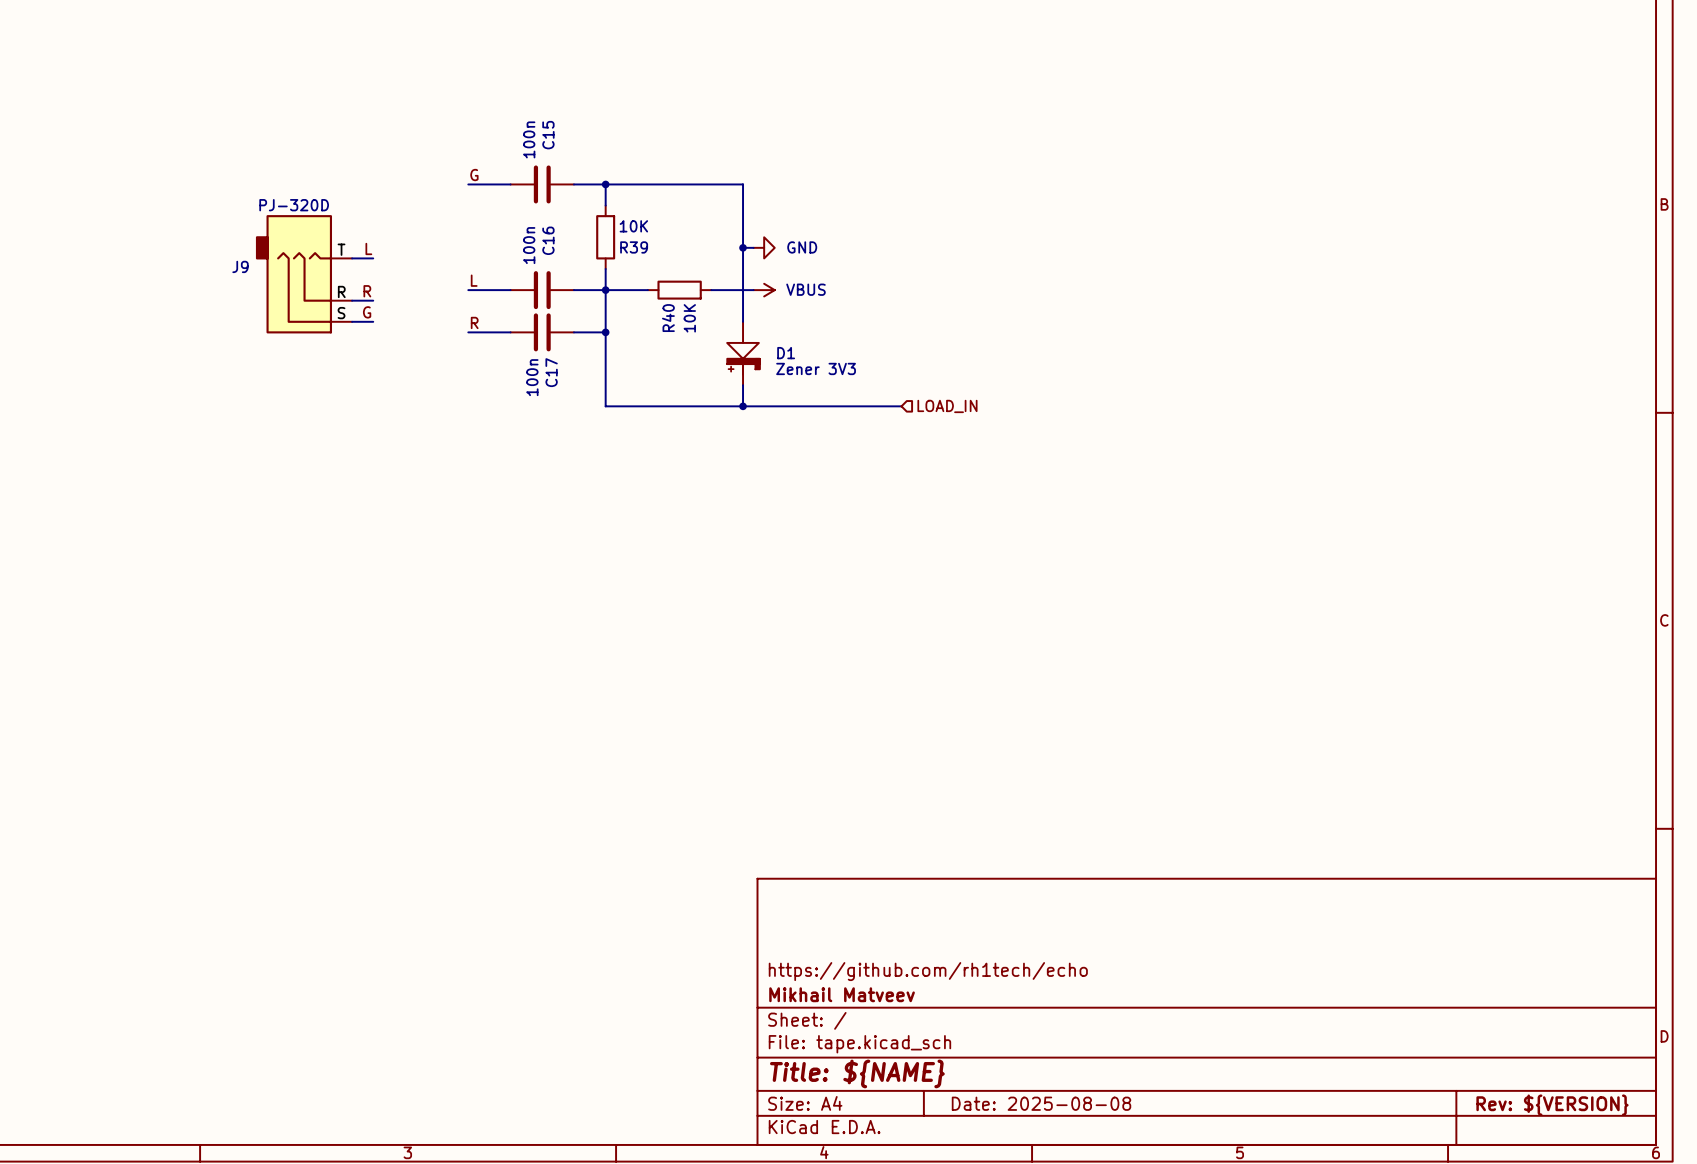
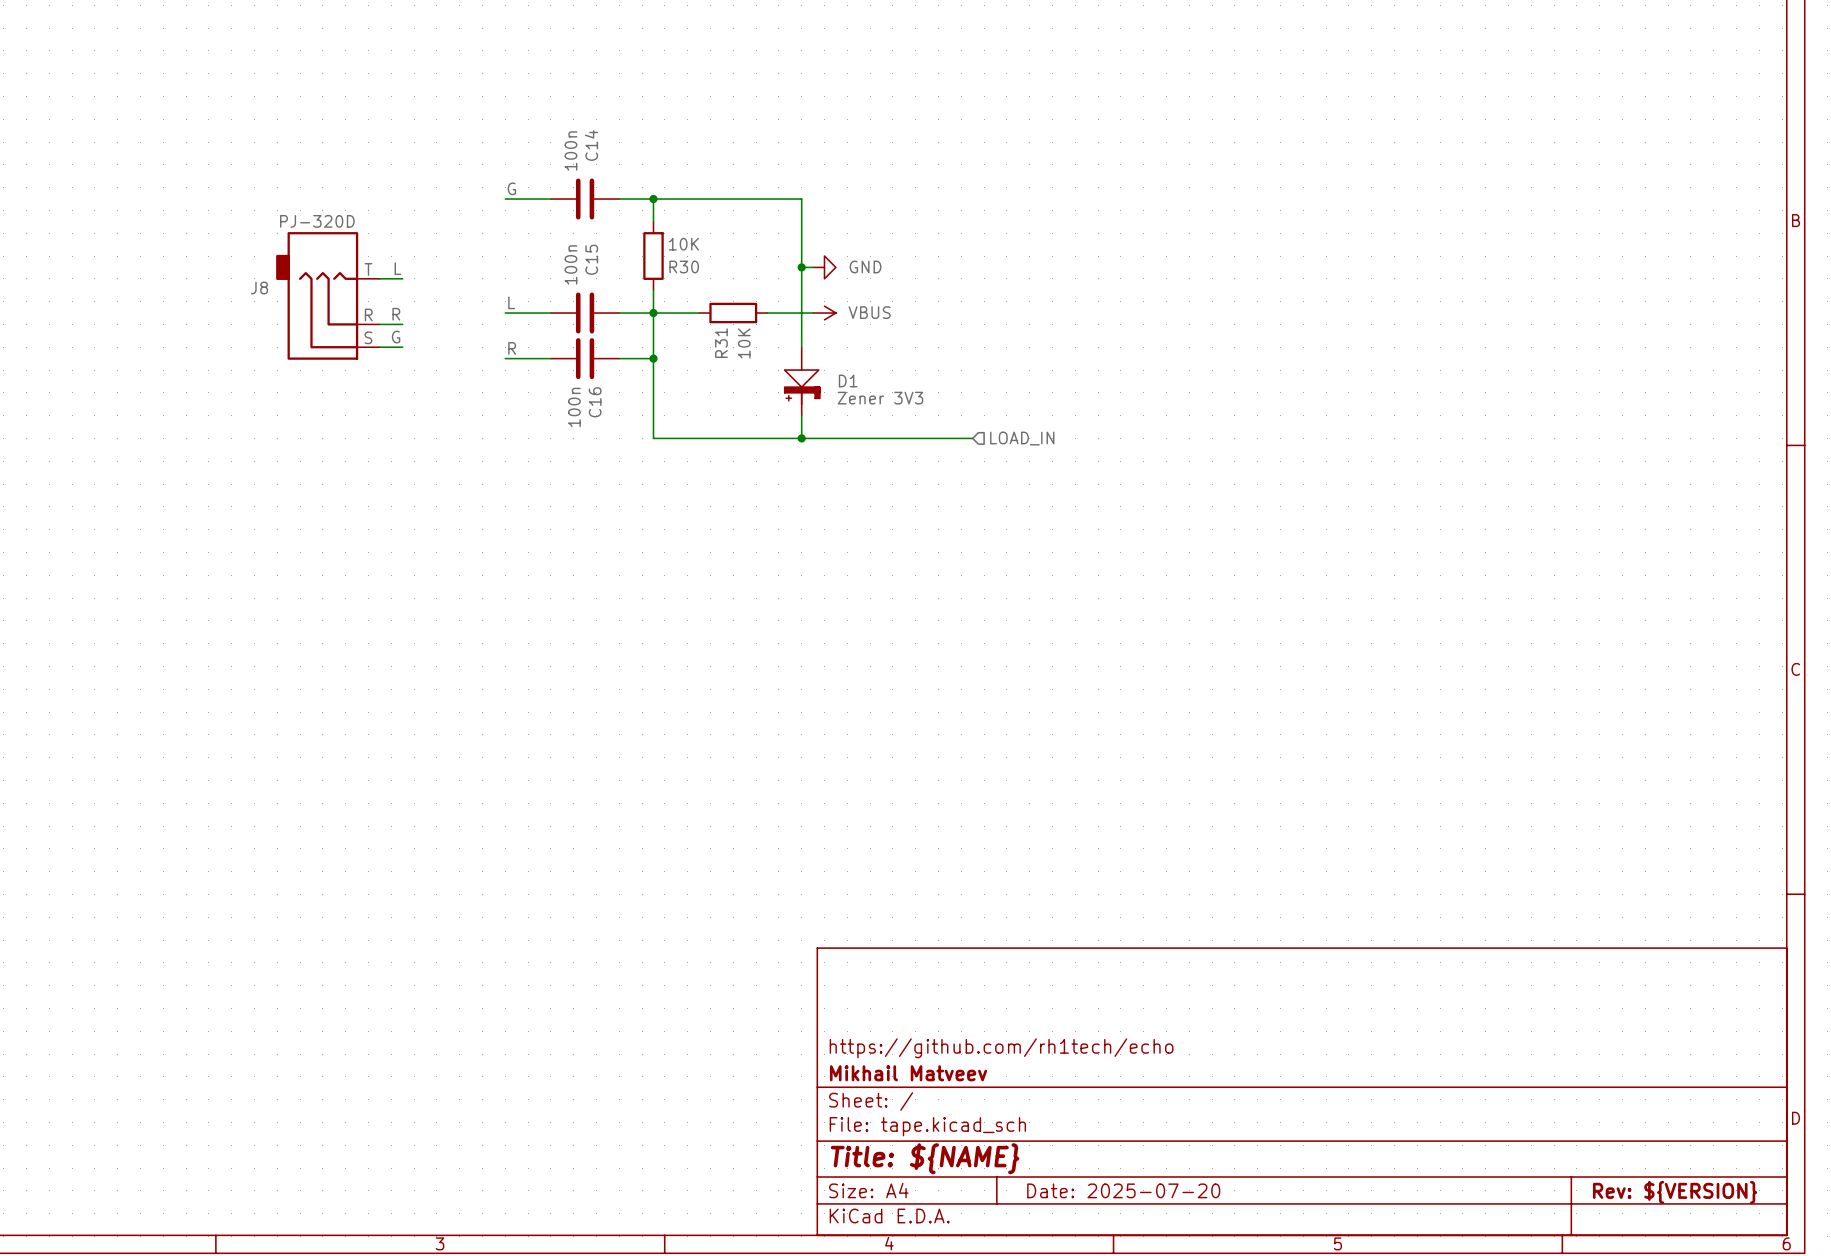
C15 name: C15 (548, 135) -> C14 (591, 145)
C16 name: C16 (548, 240) -> C15 (591, 259)
R39 name: R39 (634, 247) -> R30 (684, 266)
J9 name: J9 (240, 266) -> J8 (259, 288)
R40 name: R40 (668, 318) -> R31 (721, 343)
C17 name: C17 (551, 372) -> C16 (595, 402)
title block: Date: 2025-08-08 (1041, 1103) -> Date: 2025-07-20 (1123, 1190)

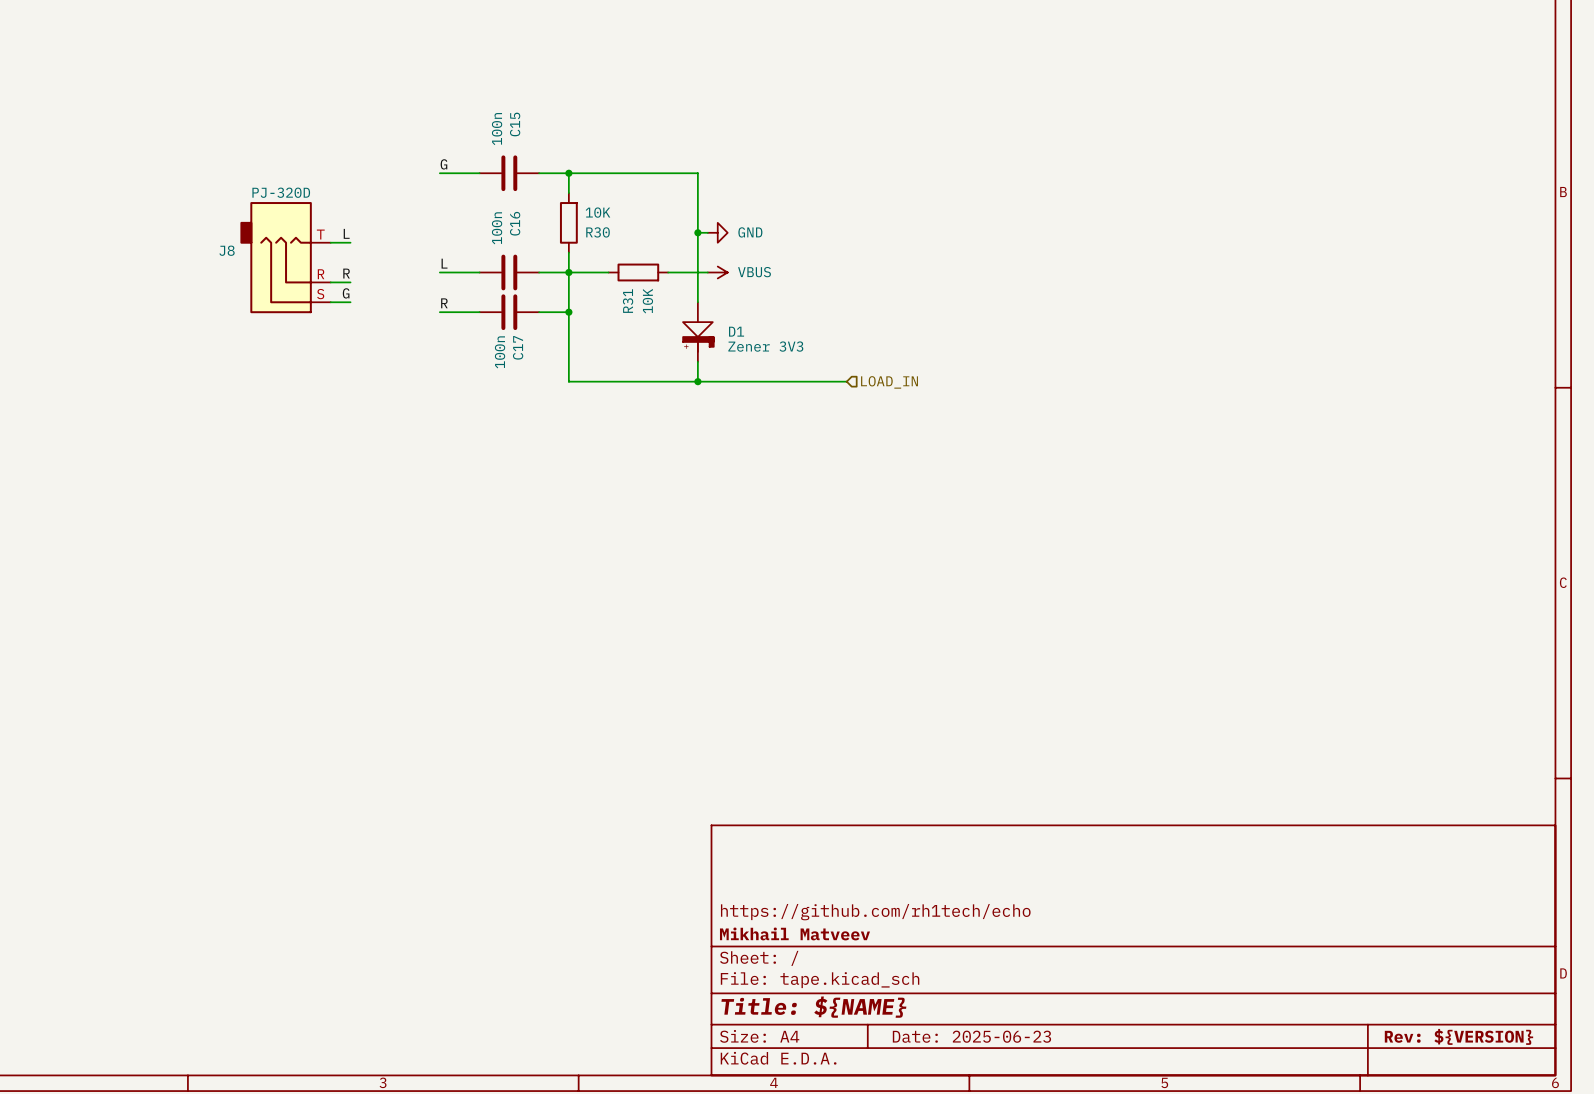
C14 name: C14 (591, 145) -> C15 (515, 124)
C15 name: C15 (591, 259) -> C16 (515, 223)
C16 name: C16 (595, 402) -> C17 (518, 347)
title block: Date: 2025-07-20 (1123, 1190) -> Date: 2025-06-23 (971, 1036)

